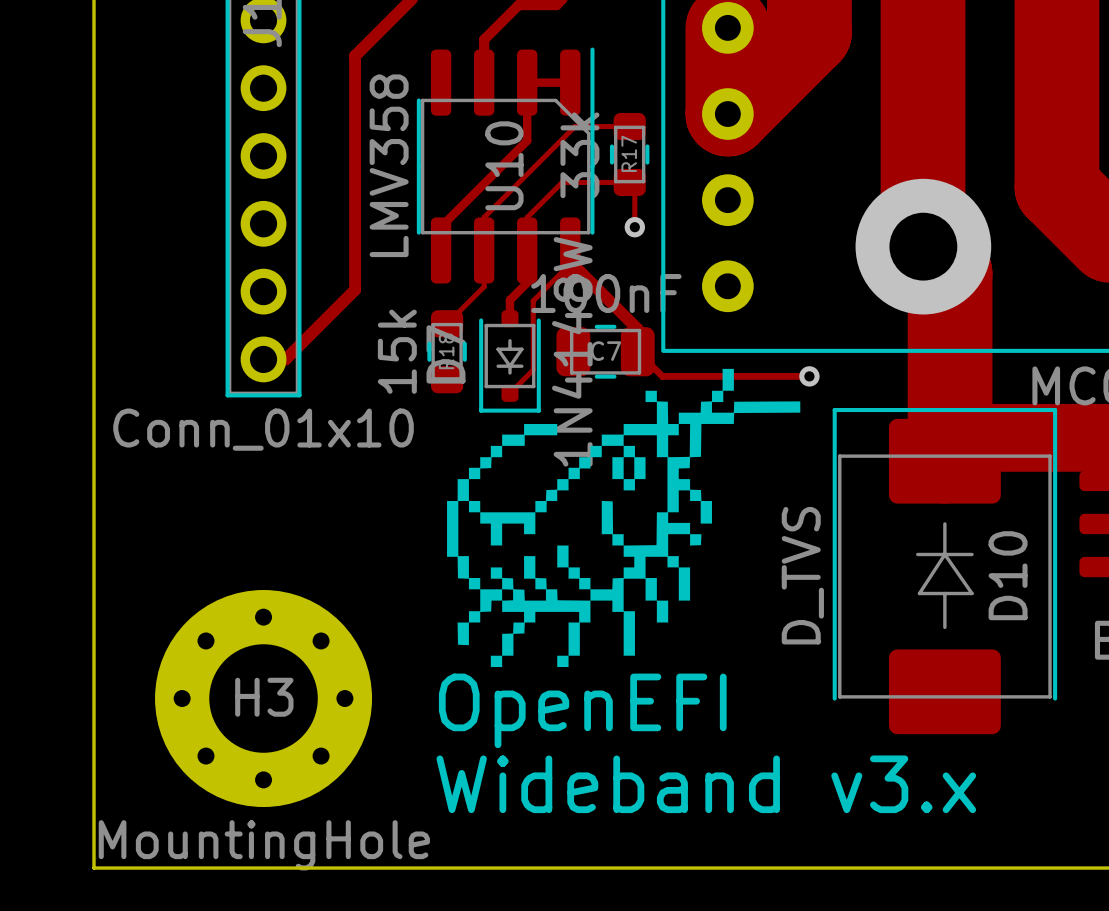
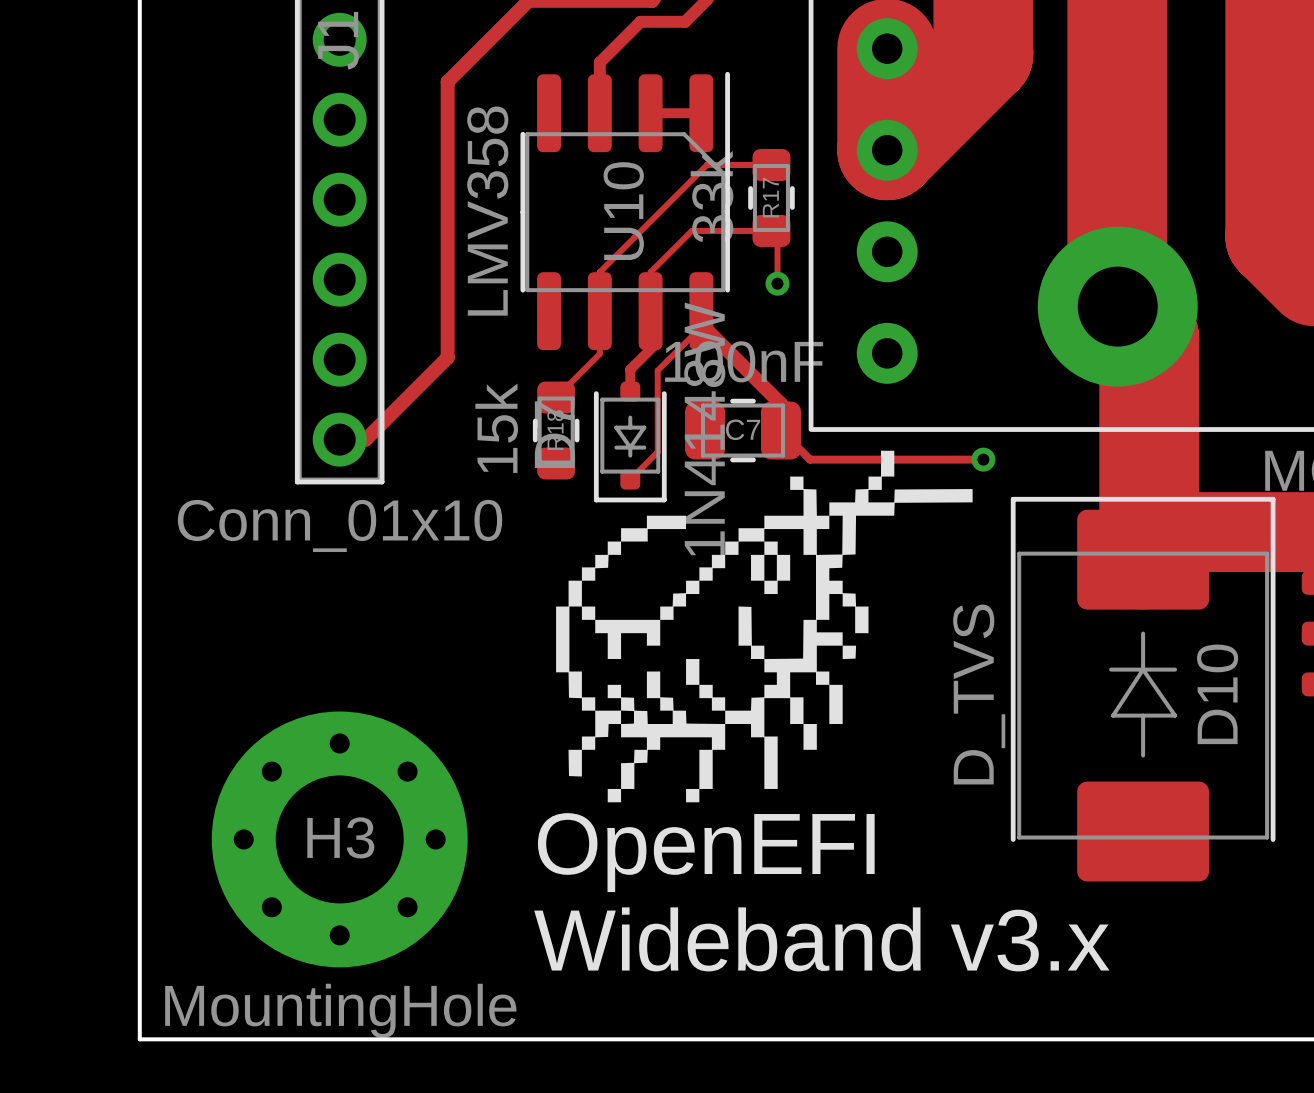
track: (527, 82) (527, 140) (441, 226) -> none

